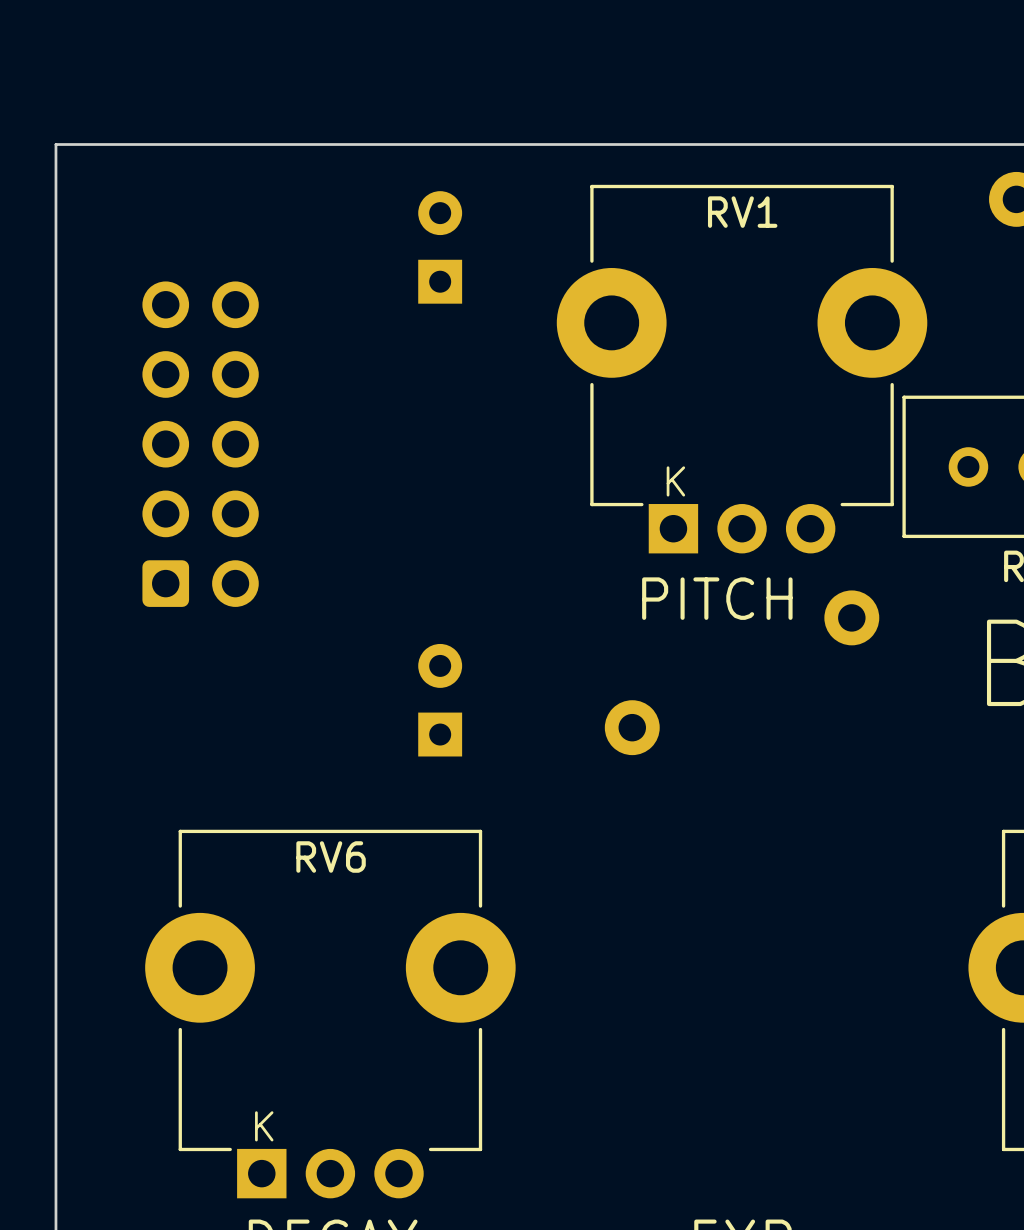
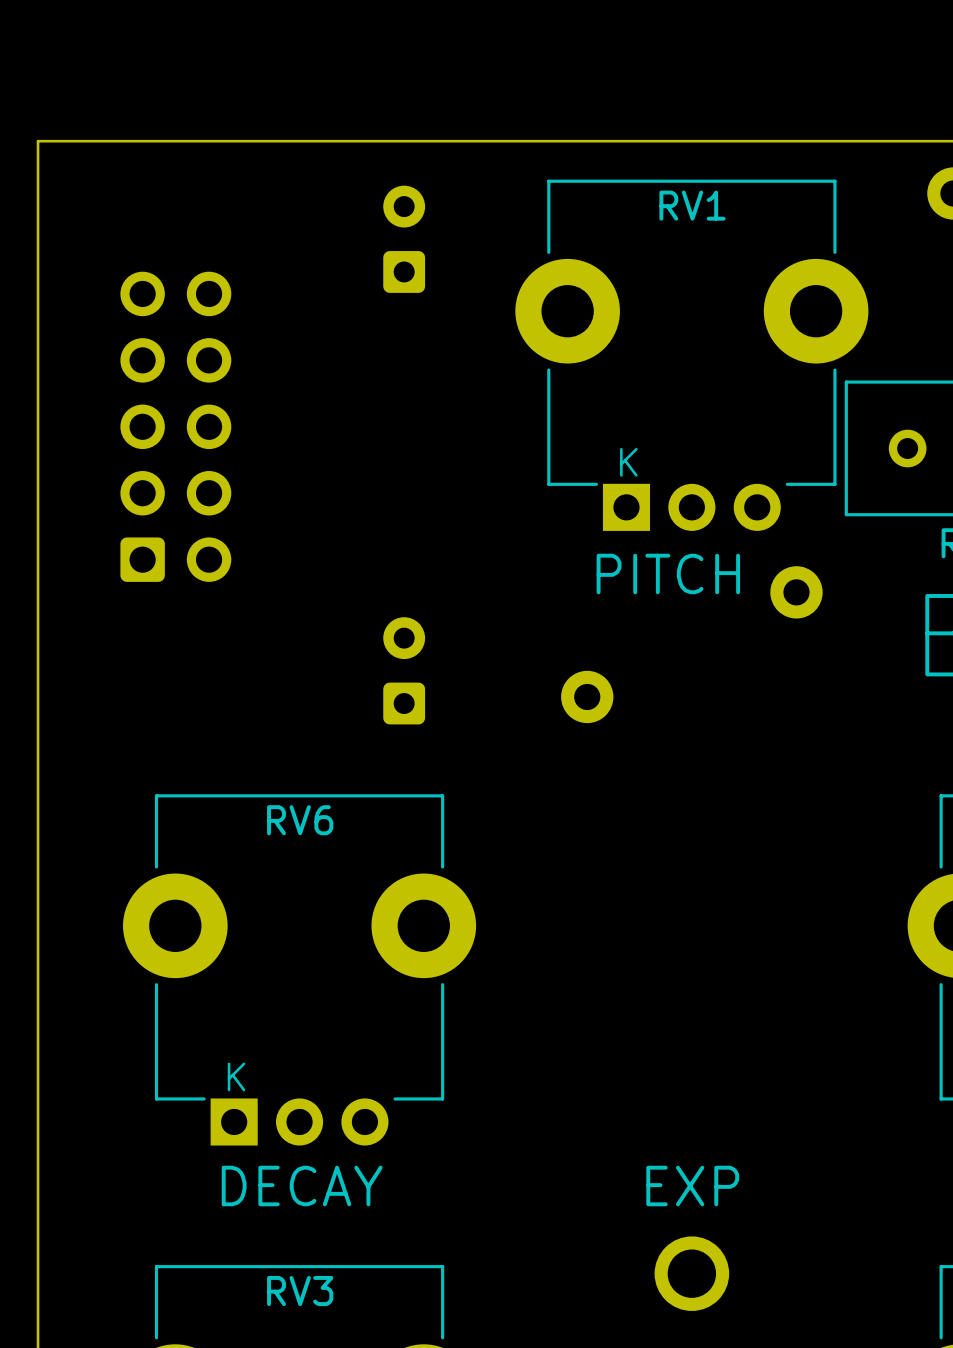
part footprint: [418, 191, 463, 304] -> [383, 185, 426, 293]
part footprint: [418, 643, 463, 757] -> [383, 617, 426, 725]

